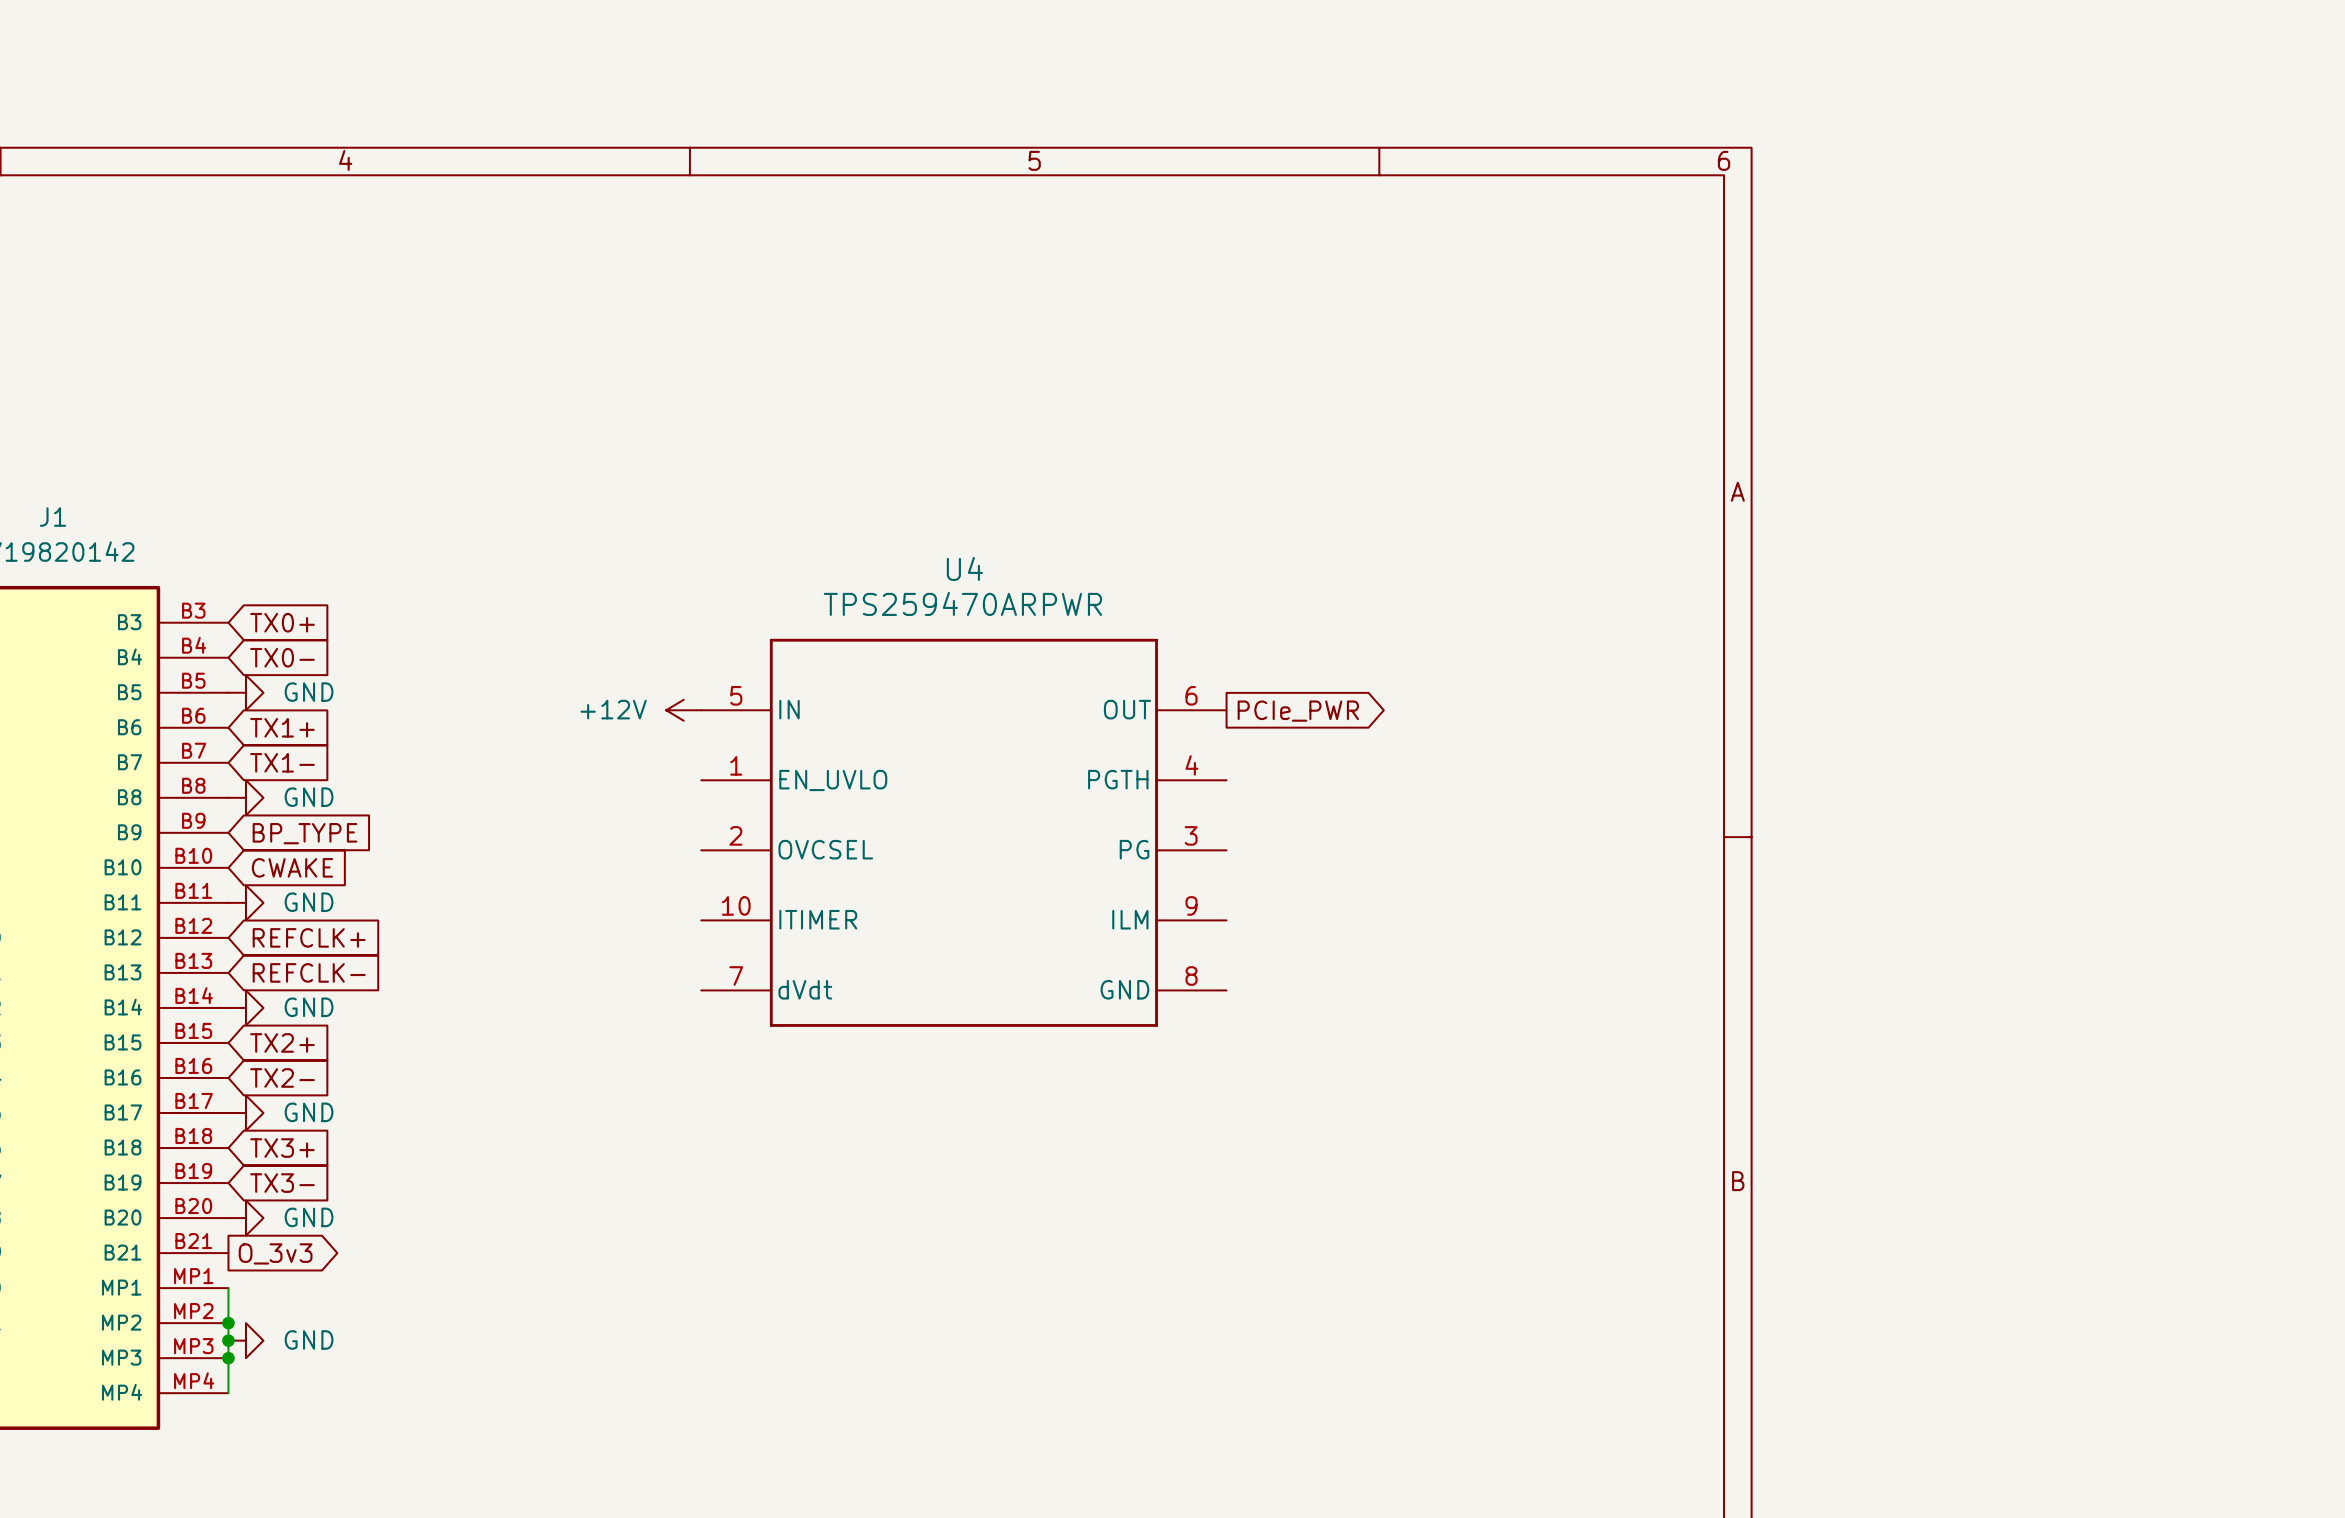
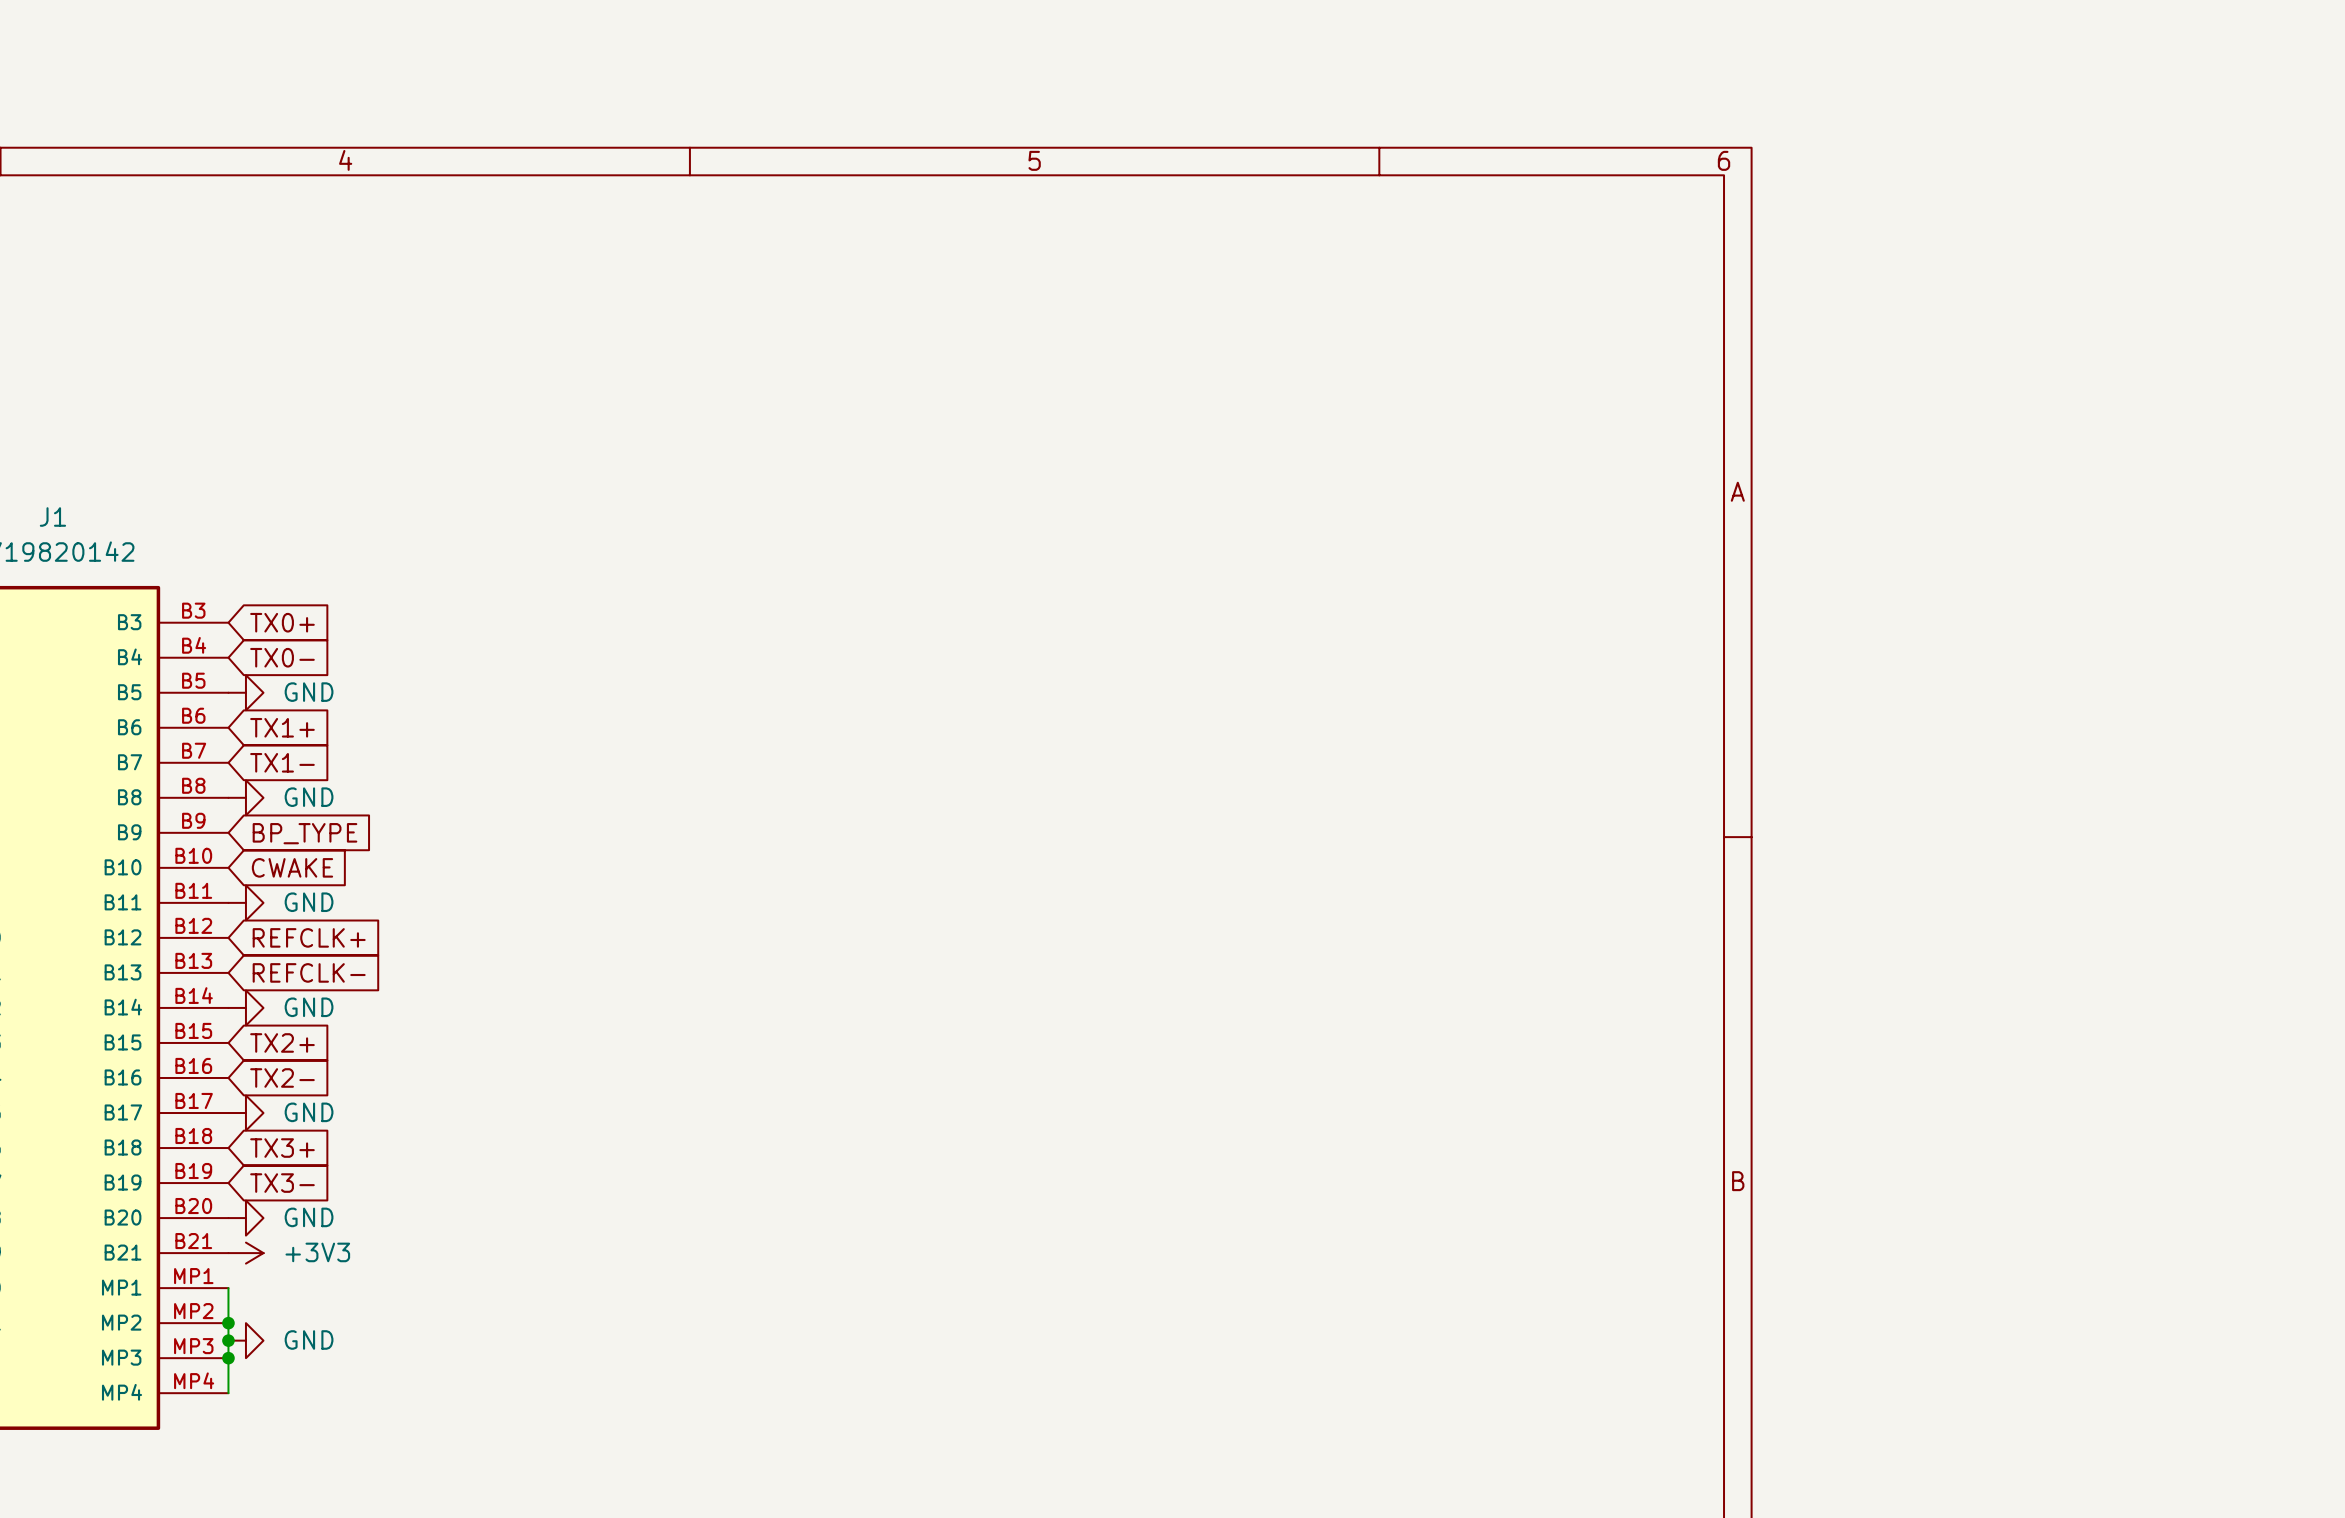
power symbol: +12V (683, 710) -> none
global label: PCIe_PWR (1298, 711) -> none
U4: TPS259470ARPWR (963, 832) -> none
power symbol: none -> +3V3 (245, 1253)
global label: O_3v3 (275, 1253) -> none

